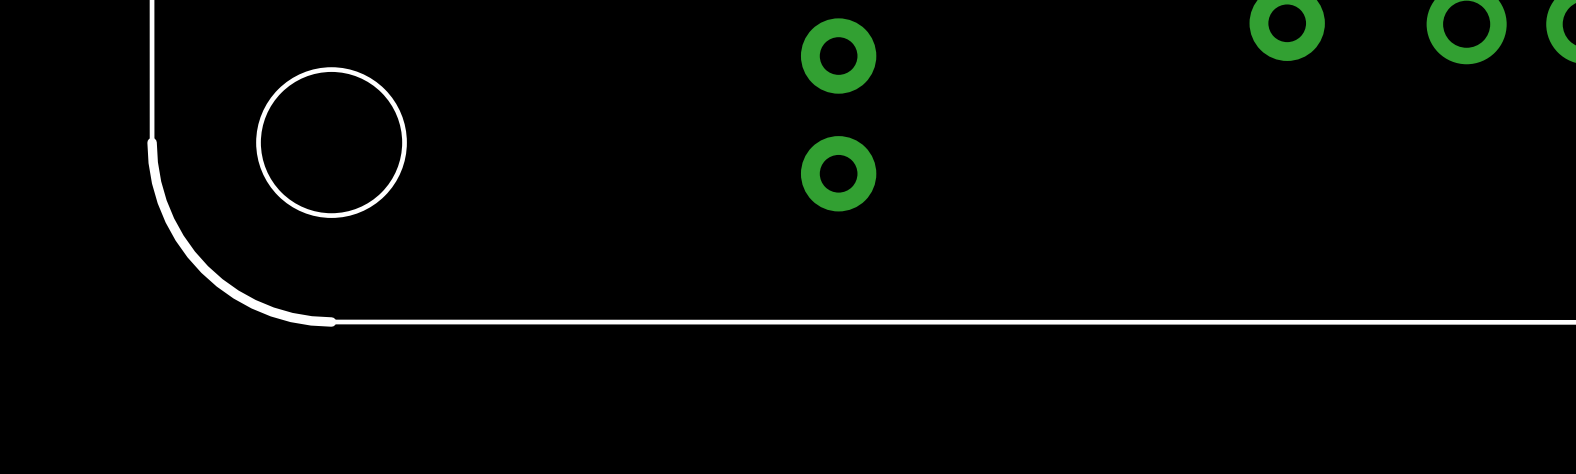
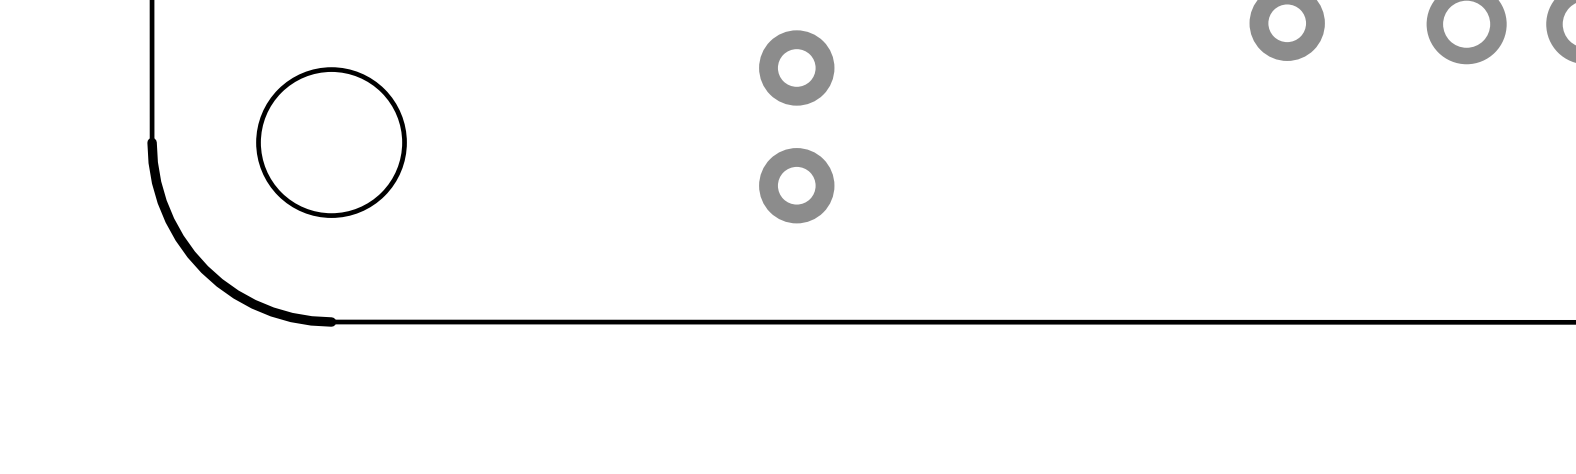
part position: (838, 114) -> (796, 126)

